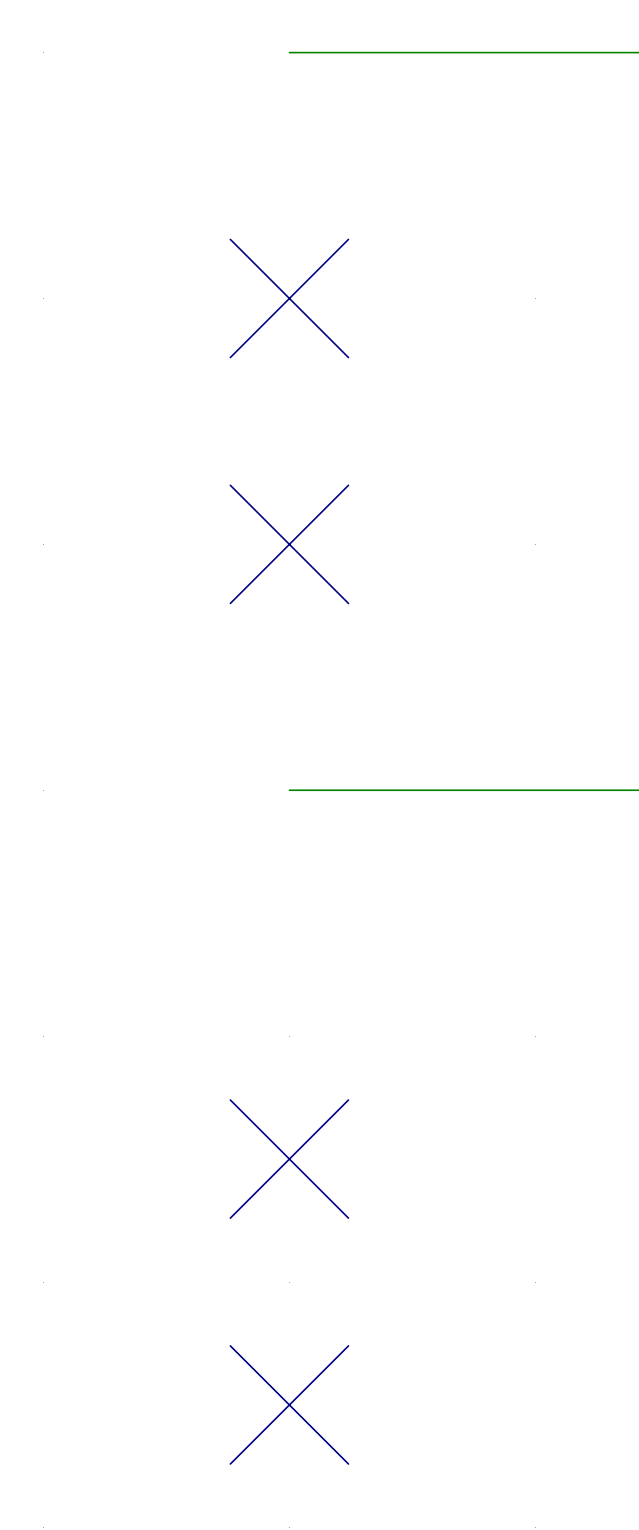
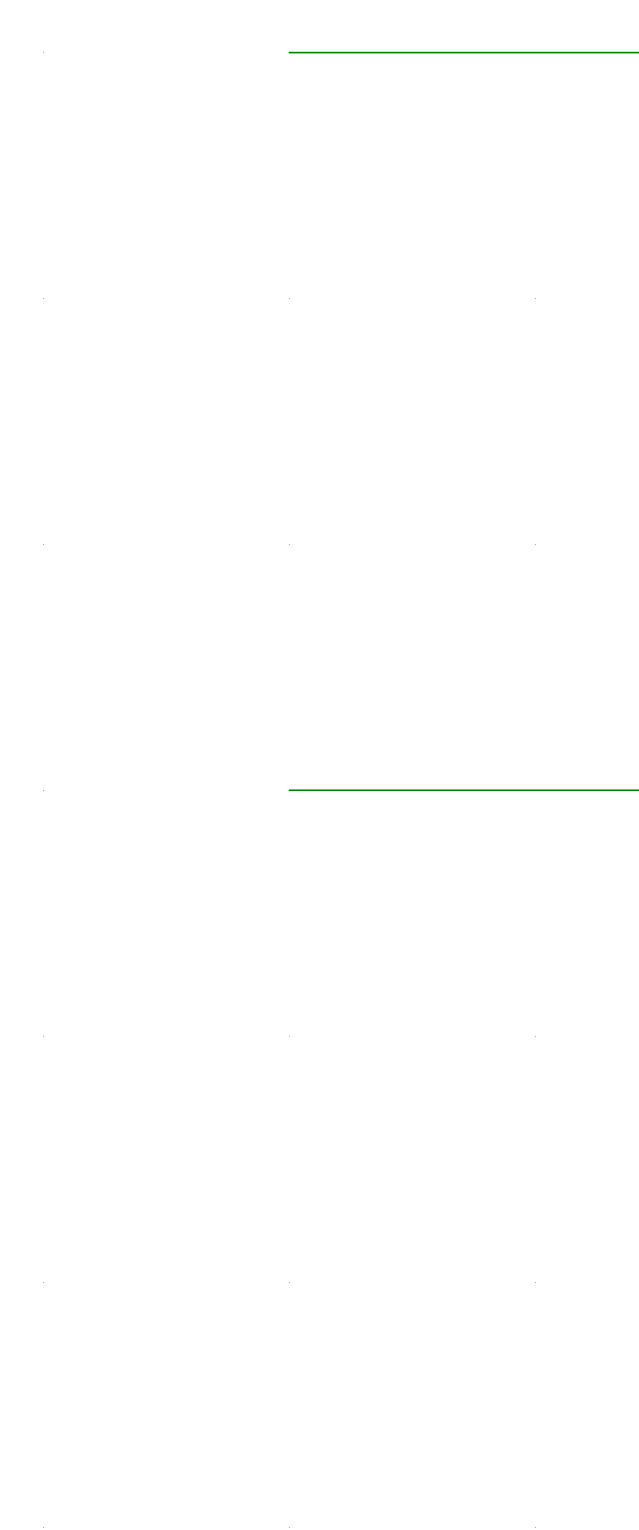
no-connect mark: (289, 298) -> none
no-connect mark: (289, 544) -> none
no-connect mark: (289, 1159) -> none
no-connect mark: (289, 1404) -> none

